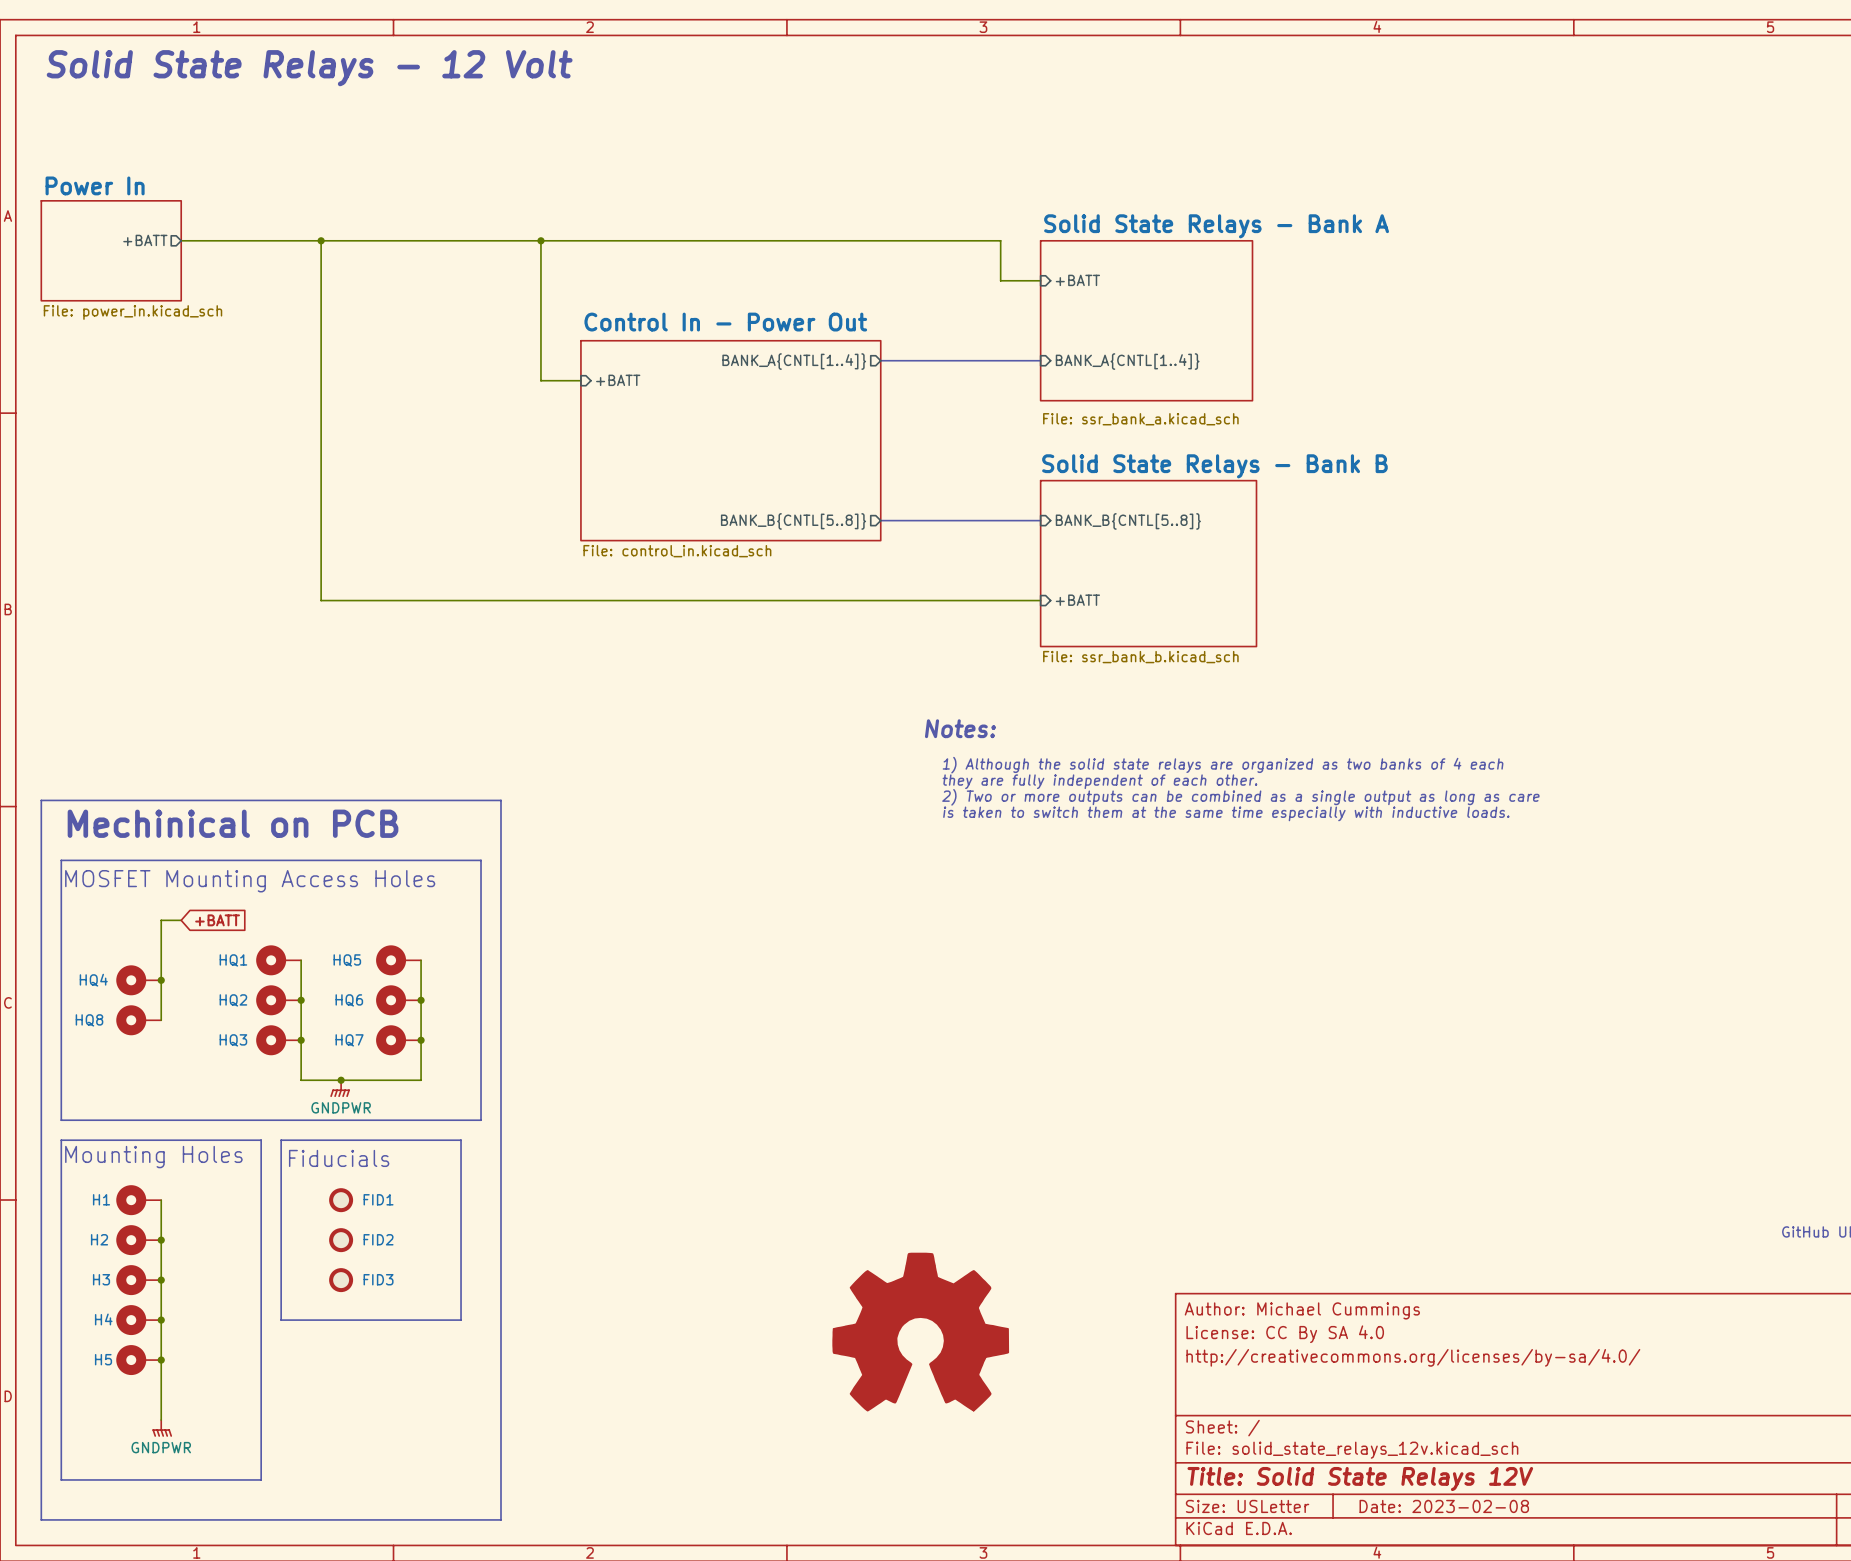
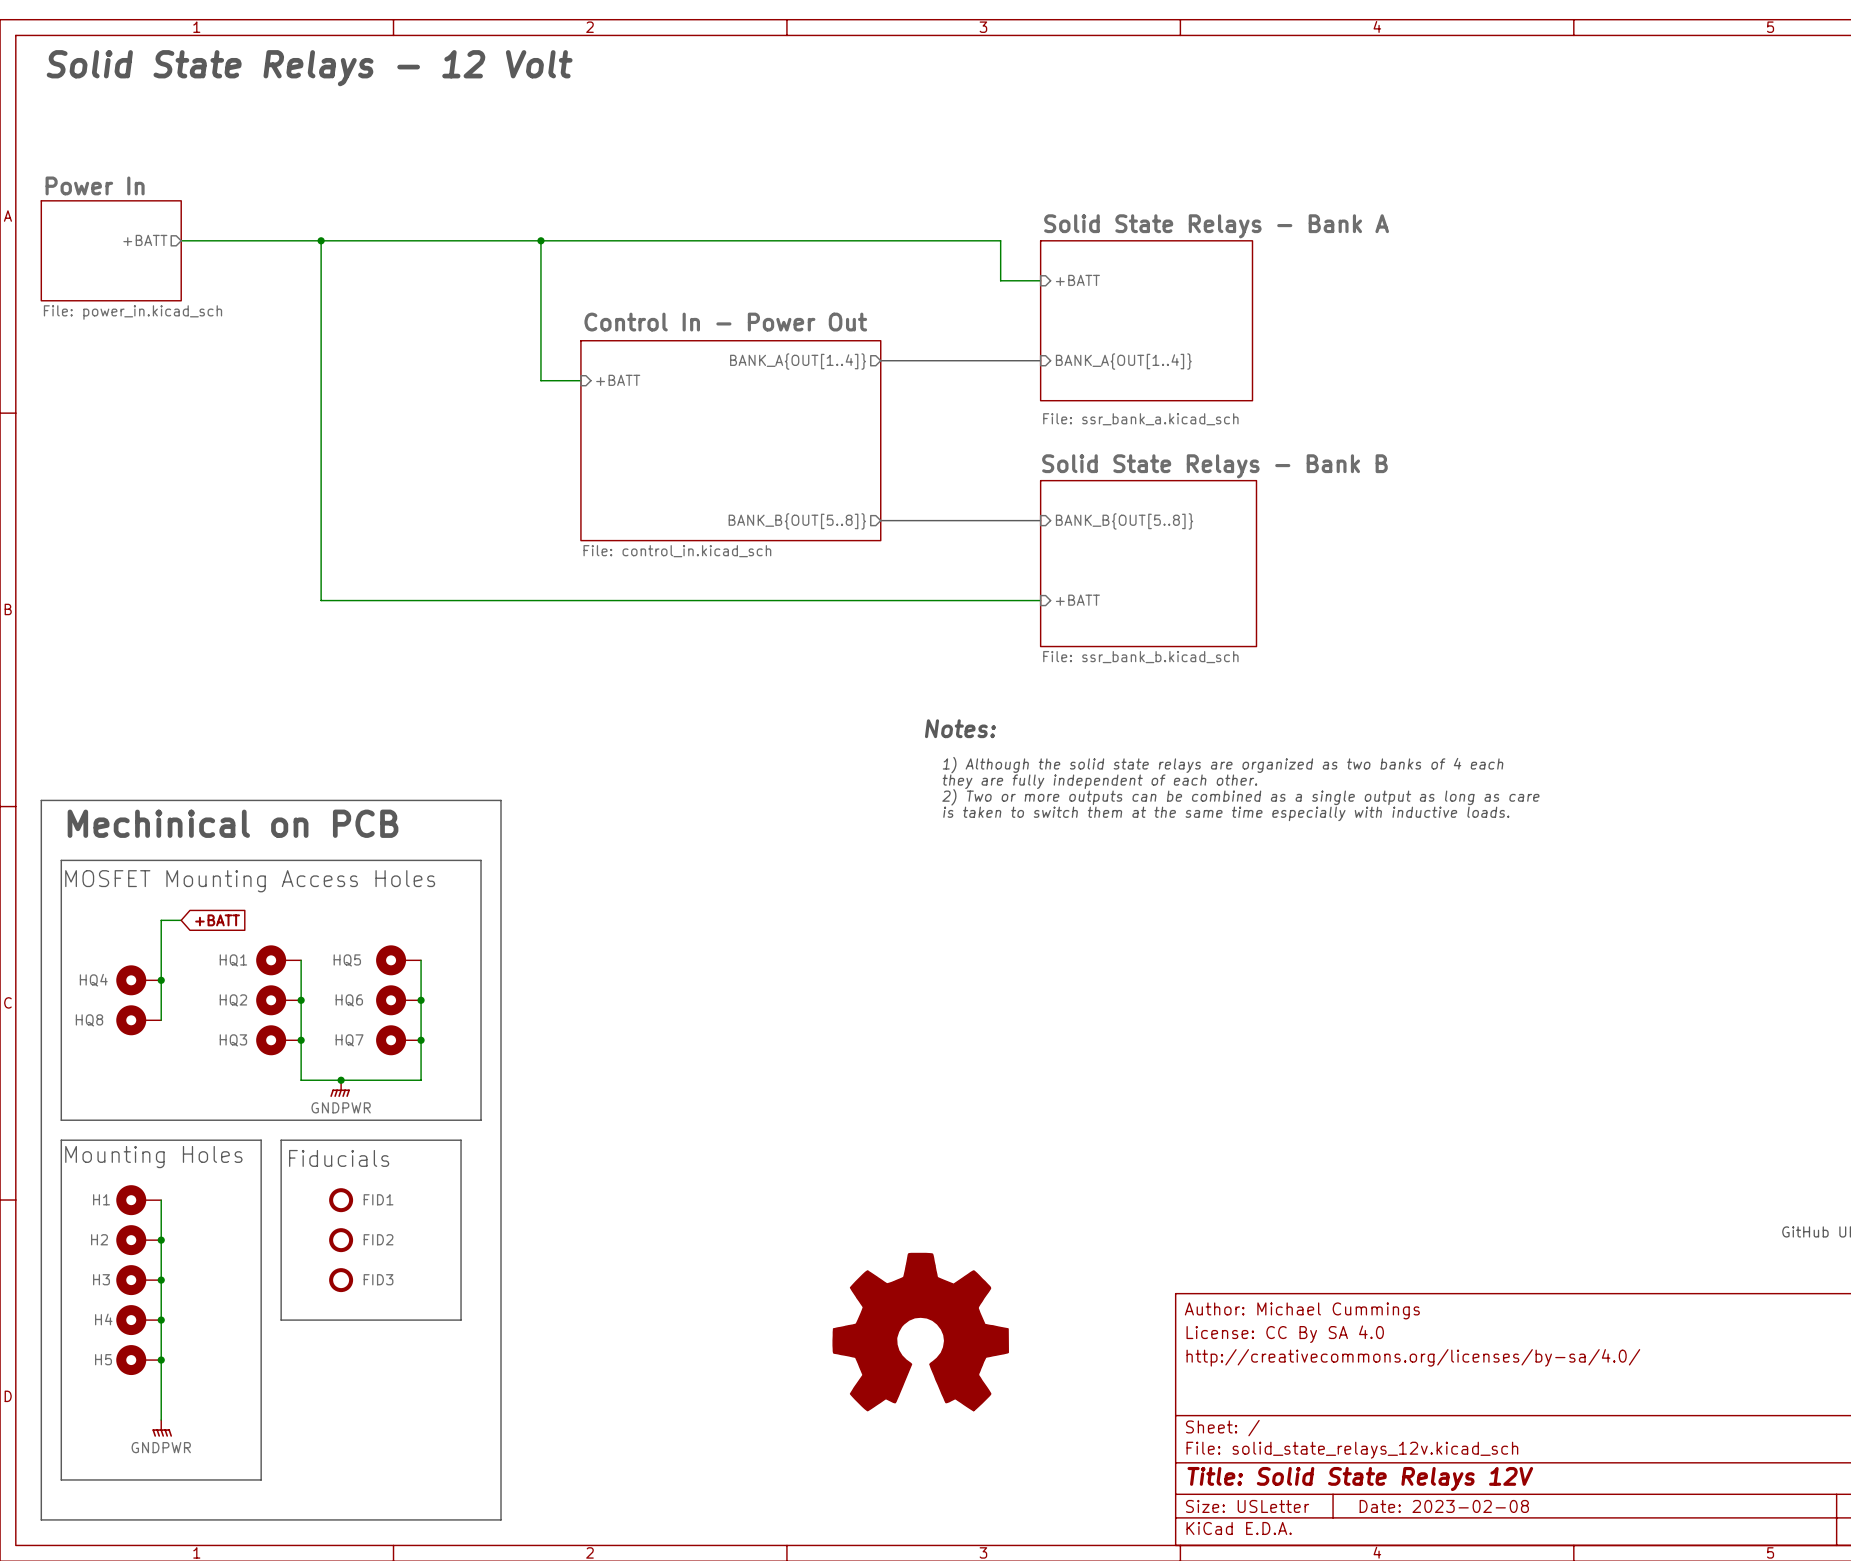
sheet pin: BANK_A{CNTL[1..4]} (794, 361) -> BANK_A{OUT[1..4]} (798, 361)
sheet pin: BANK_A{CNTL[1..4]} (1127, 361) -> BANK_A{OUT[1..4]} (1123, 361)
sheet pin: BANK_B{CNTL[5..8]} (793, 521) -> BANK_B{OUT[5..8]} (797, 521)
sheet pin: BANK_B{CNTL[5..8]} (1128, 521) -> BANK_B{OUT[5..8]} (1124, 521)

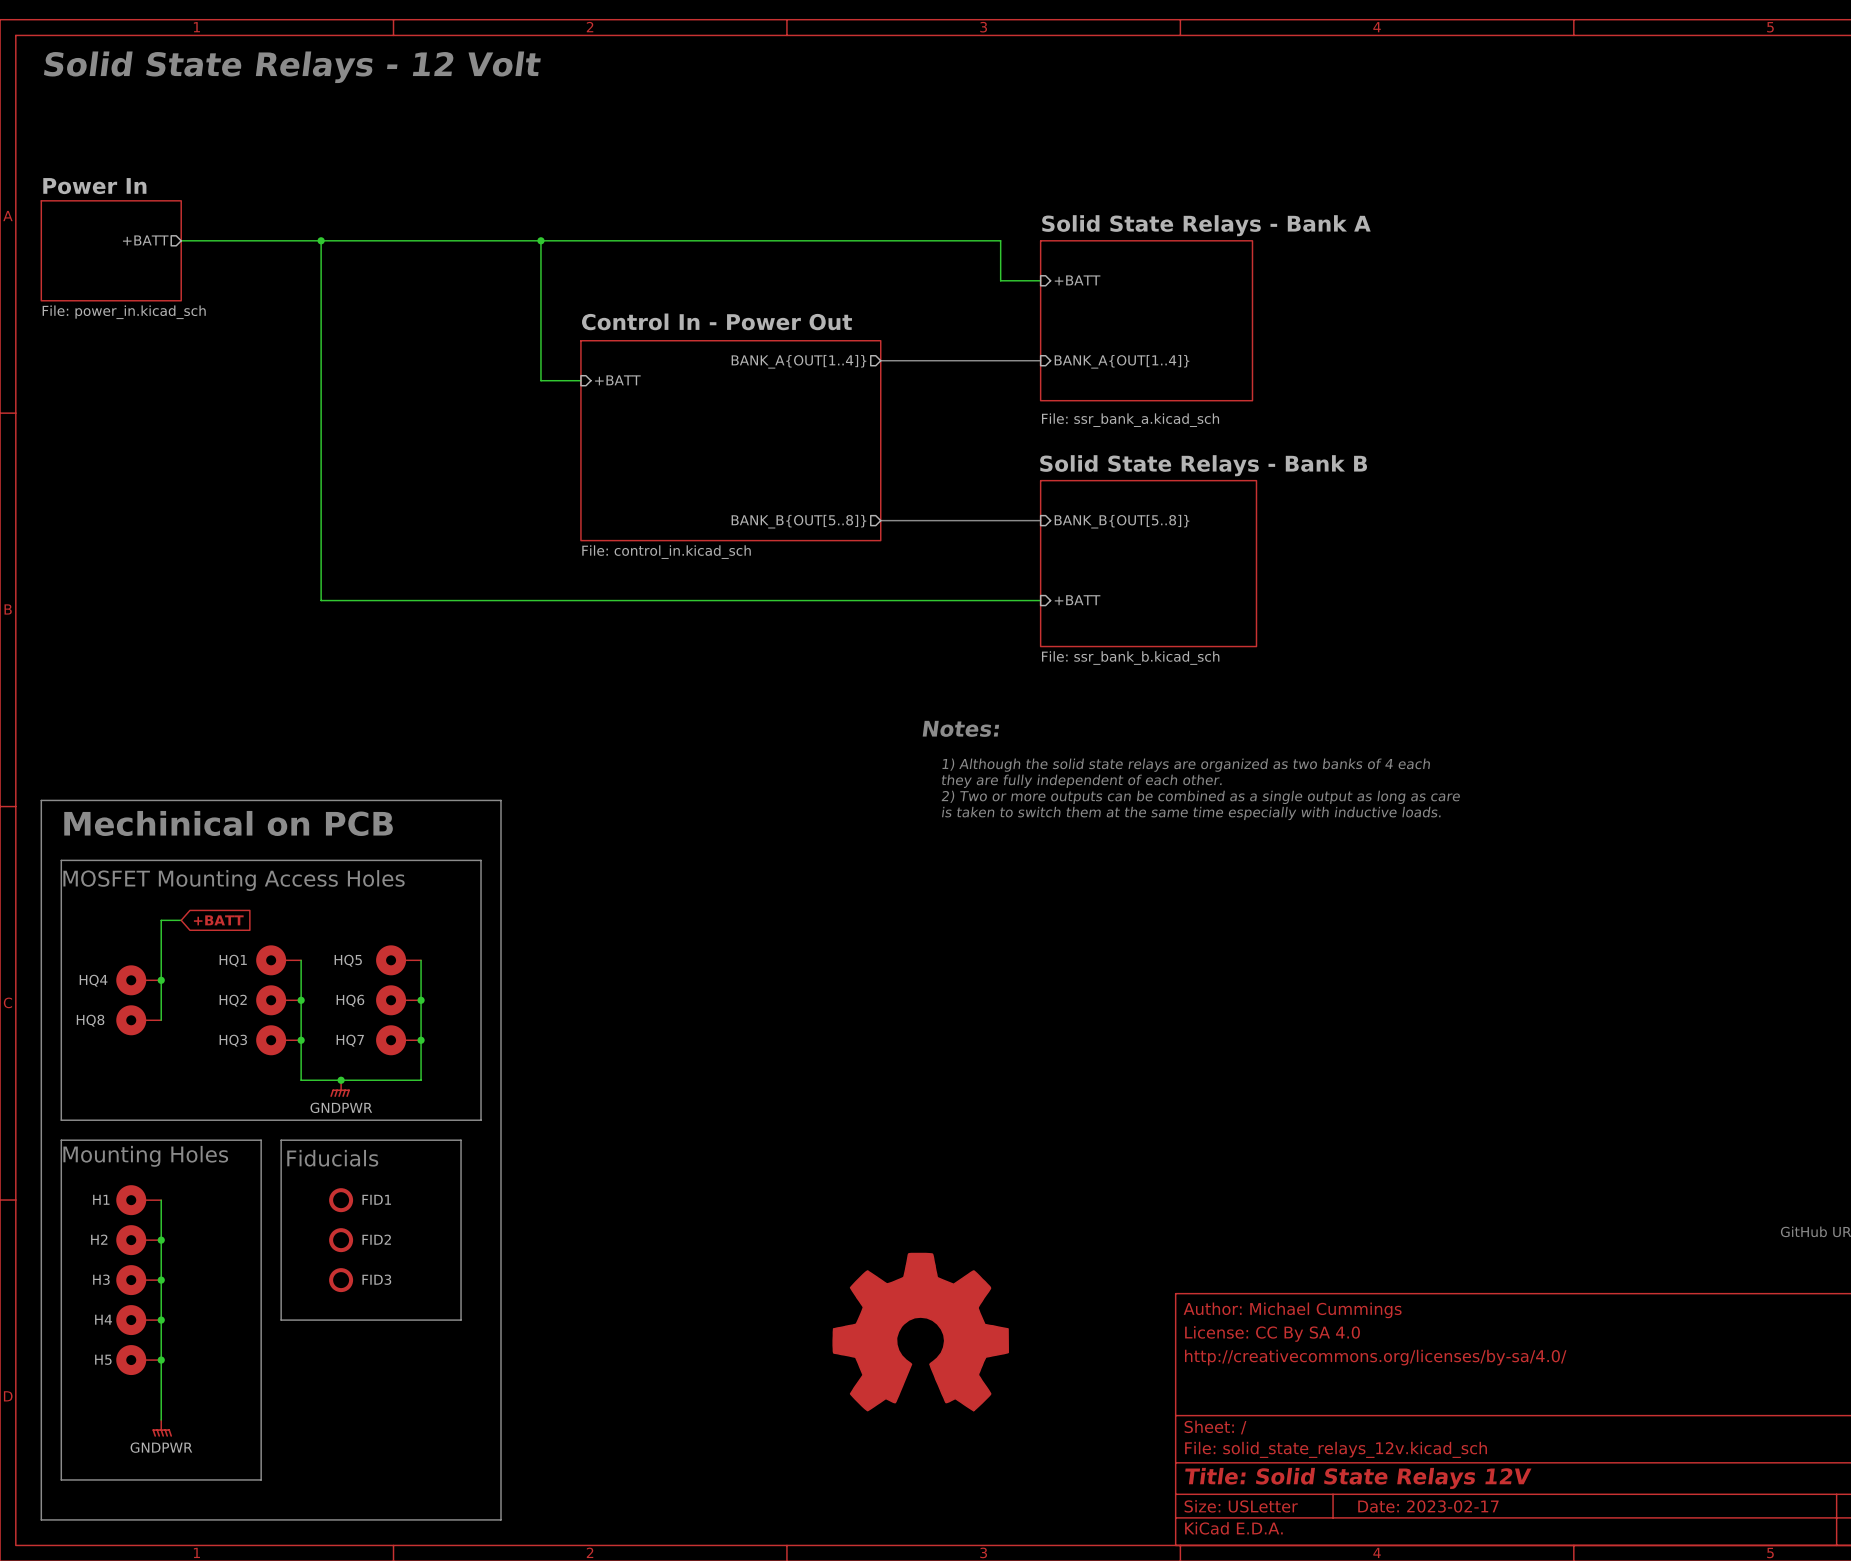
title block: Date: 2023-02-08 (1444, 1506) -> Date: 2023-02-17 (1428, 1506)

